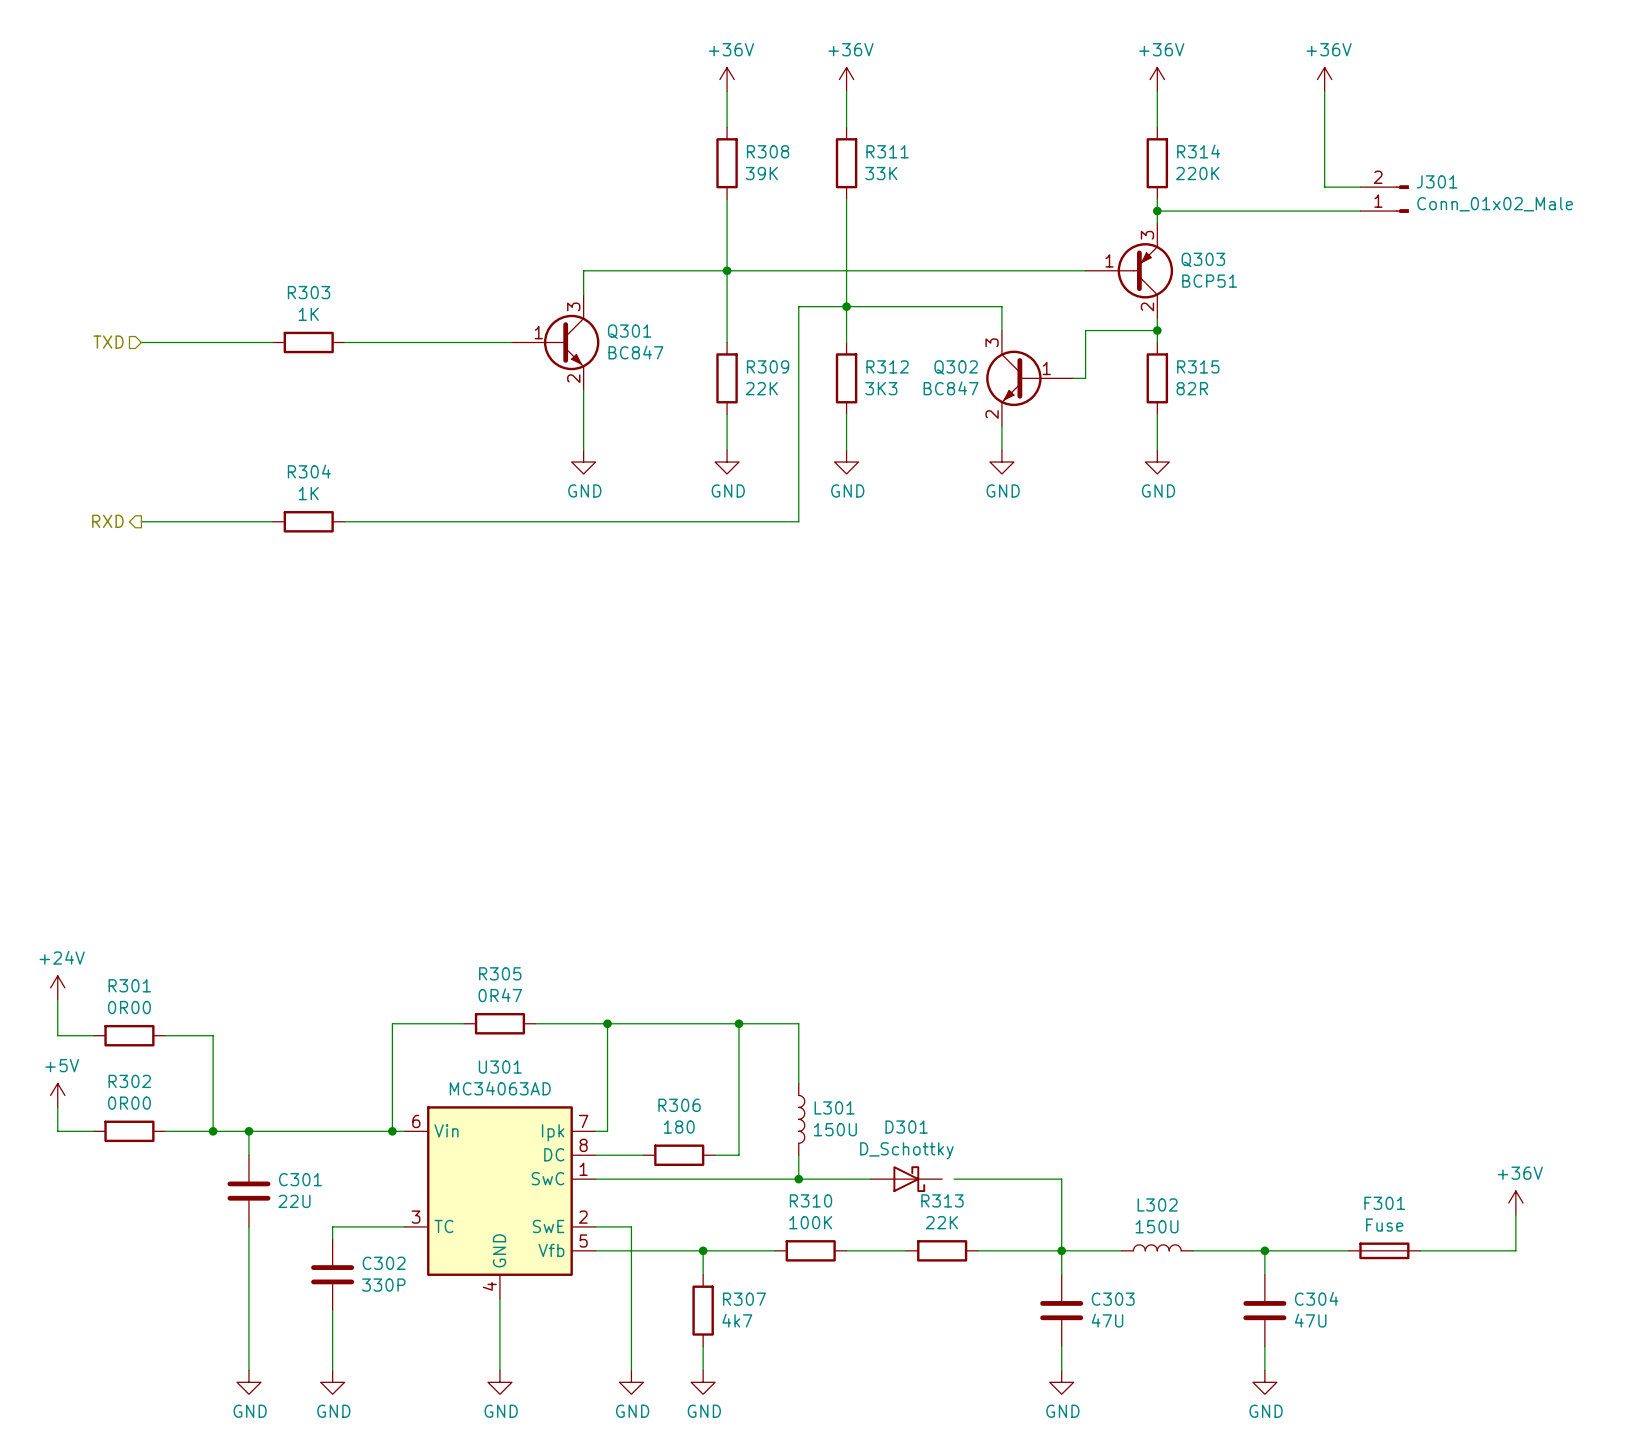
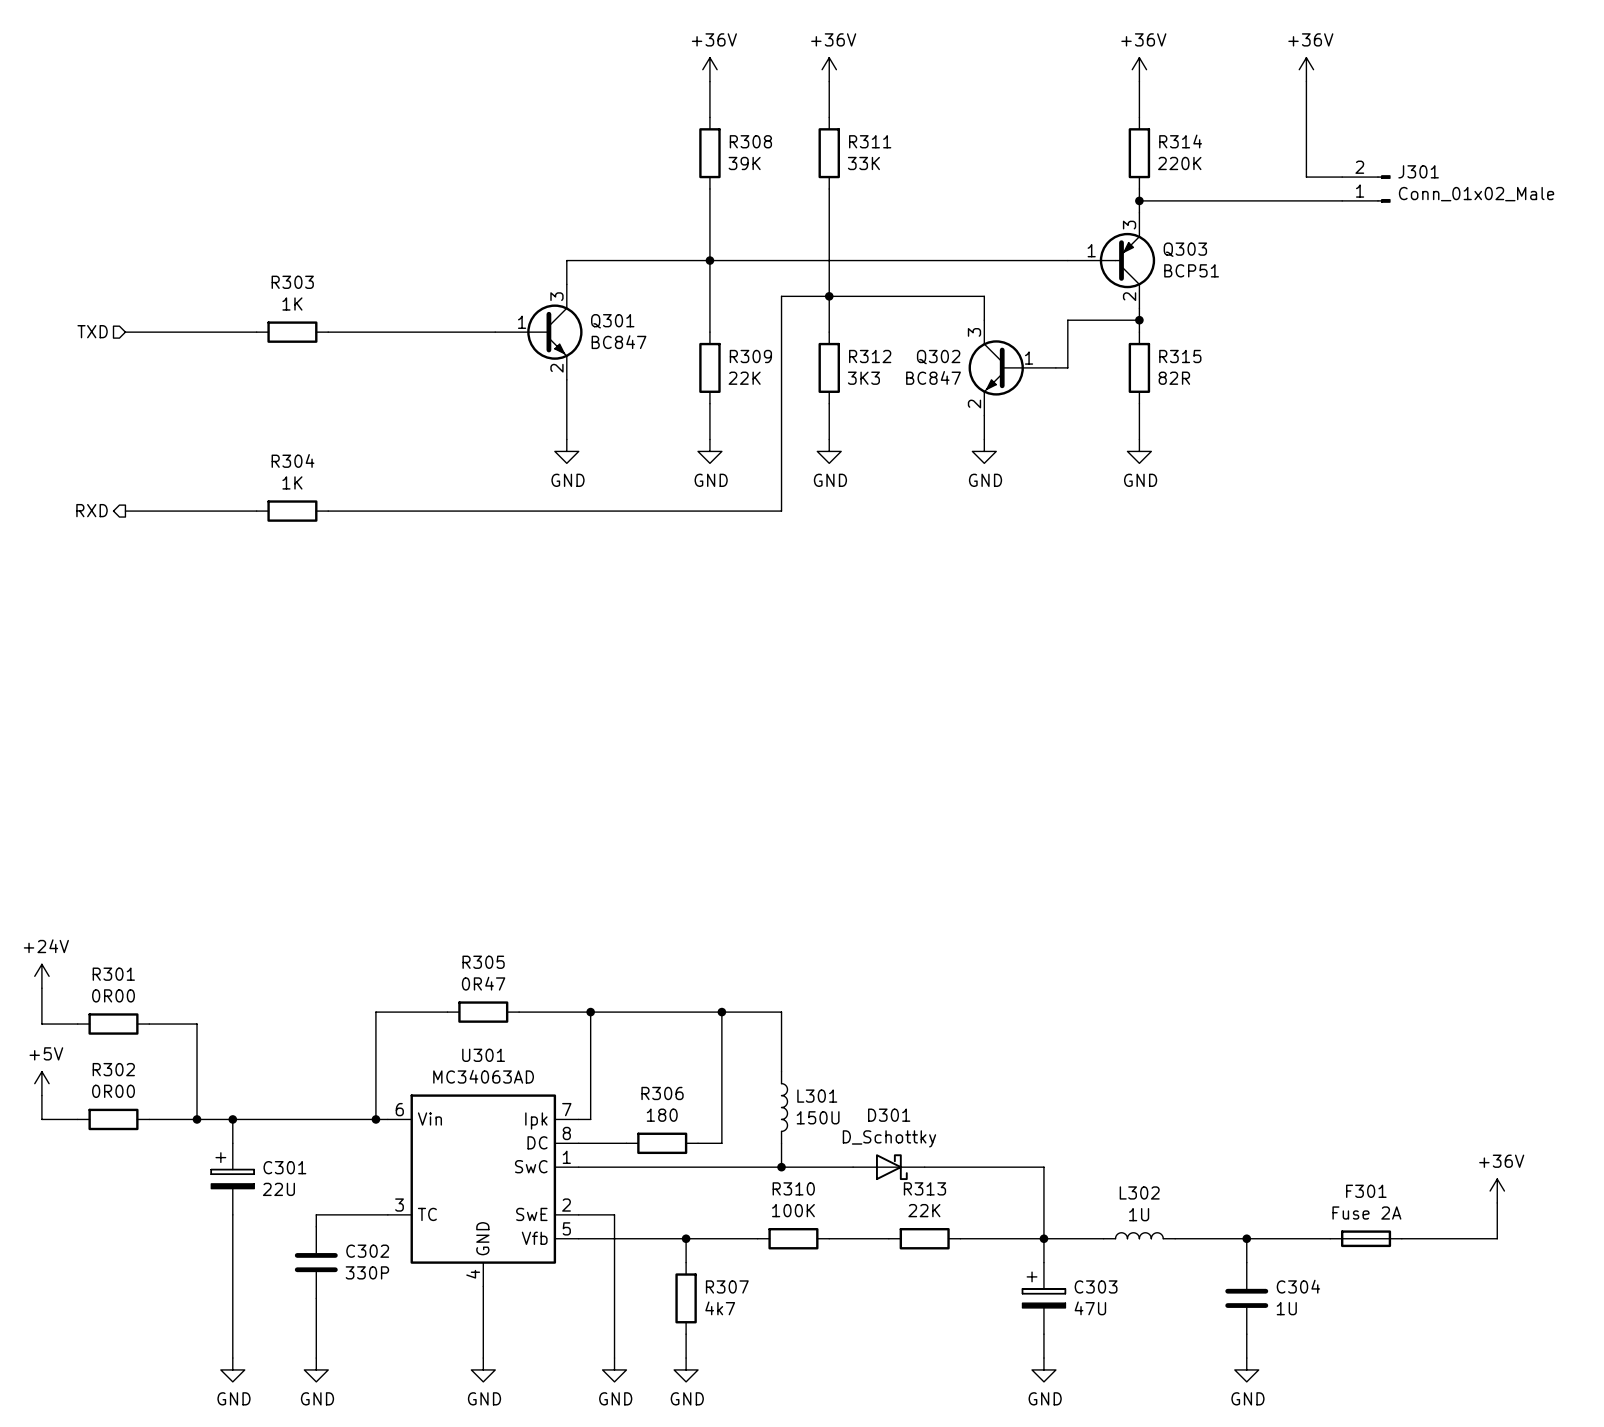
C301 symbol: [227, 1155, 271, 1227] -> [211, 1143, 255, 1215]
wire: none -> (924, 1167) (936, 1167)
F301 value: Fuse (1384, 1225) -> Fuse 2A (1366, 1213)
L302 value: 150U (1157, 1226) -> 1U (1139, 1214)
C303 symbol: [1040, 1274, 1084, 1347] -> [1022, 1262, 1066, 1335]
C304 value: 47U (1310, 1320) -> 1U (1286, 1308)

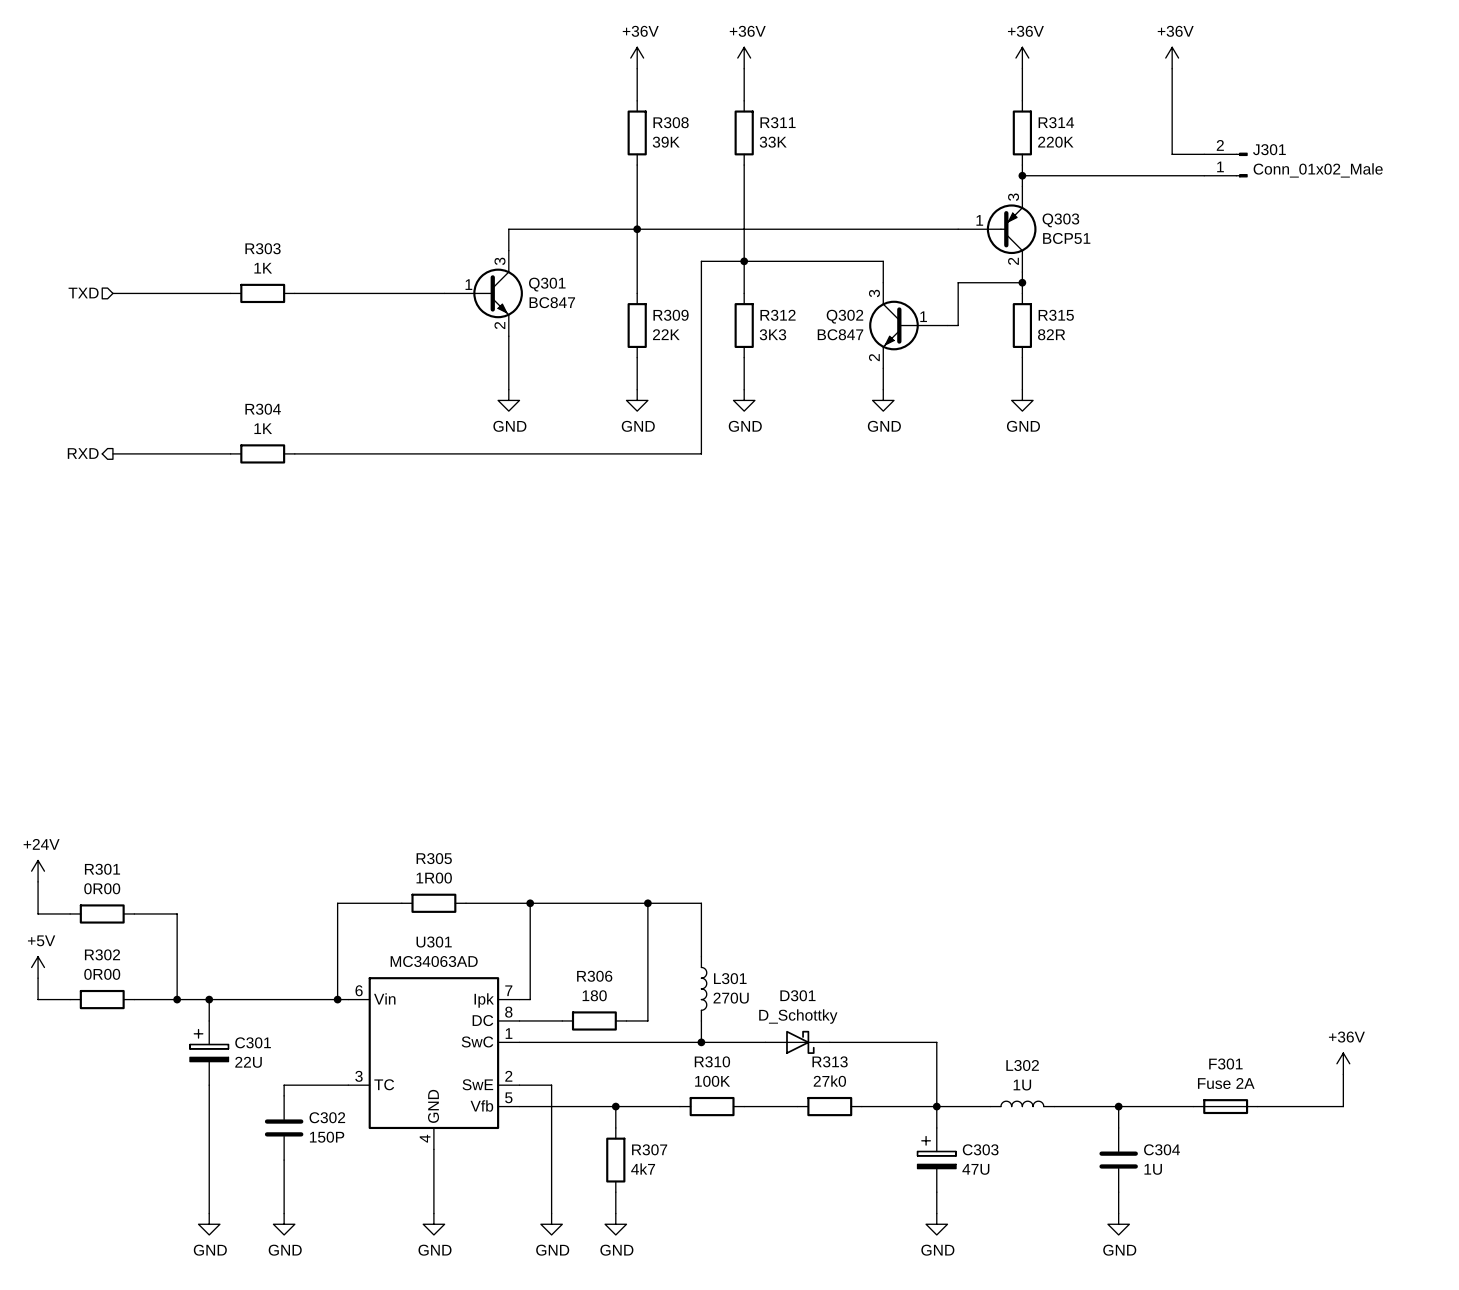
R305 value: 0R47 (483, 983) -> 1R00 (434, 878)
L301 value: 150U (818, 1117) -> 270U (731, 998)
R313 value: 22K (924, 1210) -> 27k0 (829, 1081)
C302 value: 330P (367, 1272) -> 150P (327, 1137)

